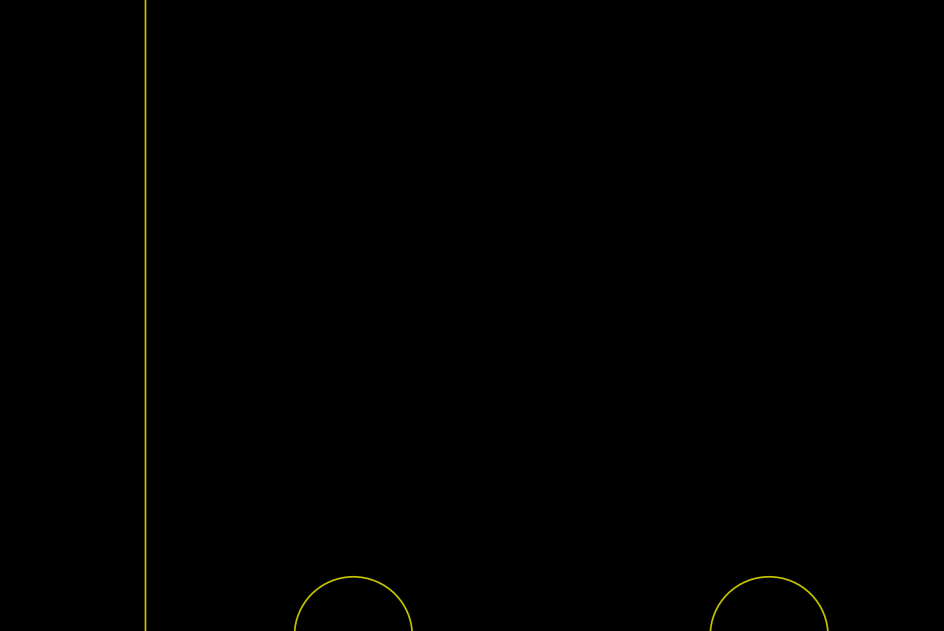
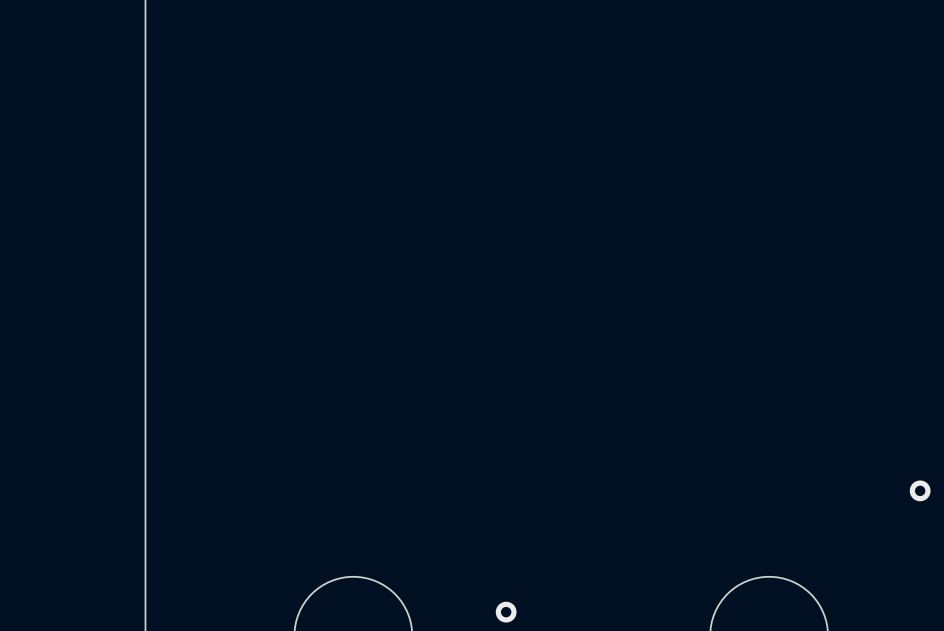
via: none -> (920, 490)
via: none -> (506, 612)

